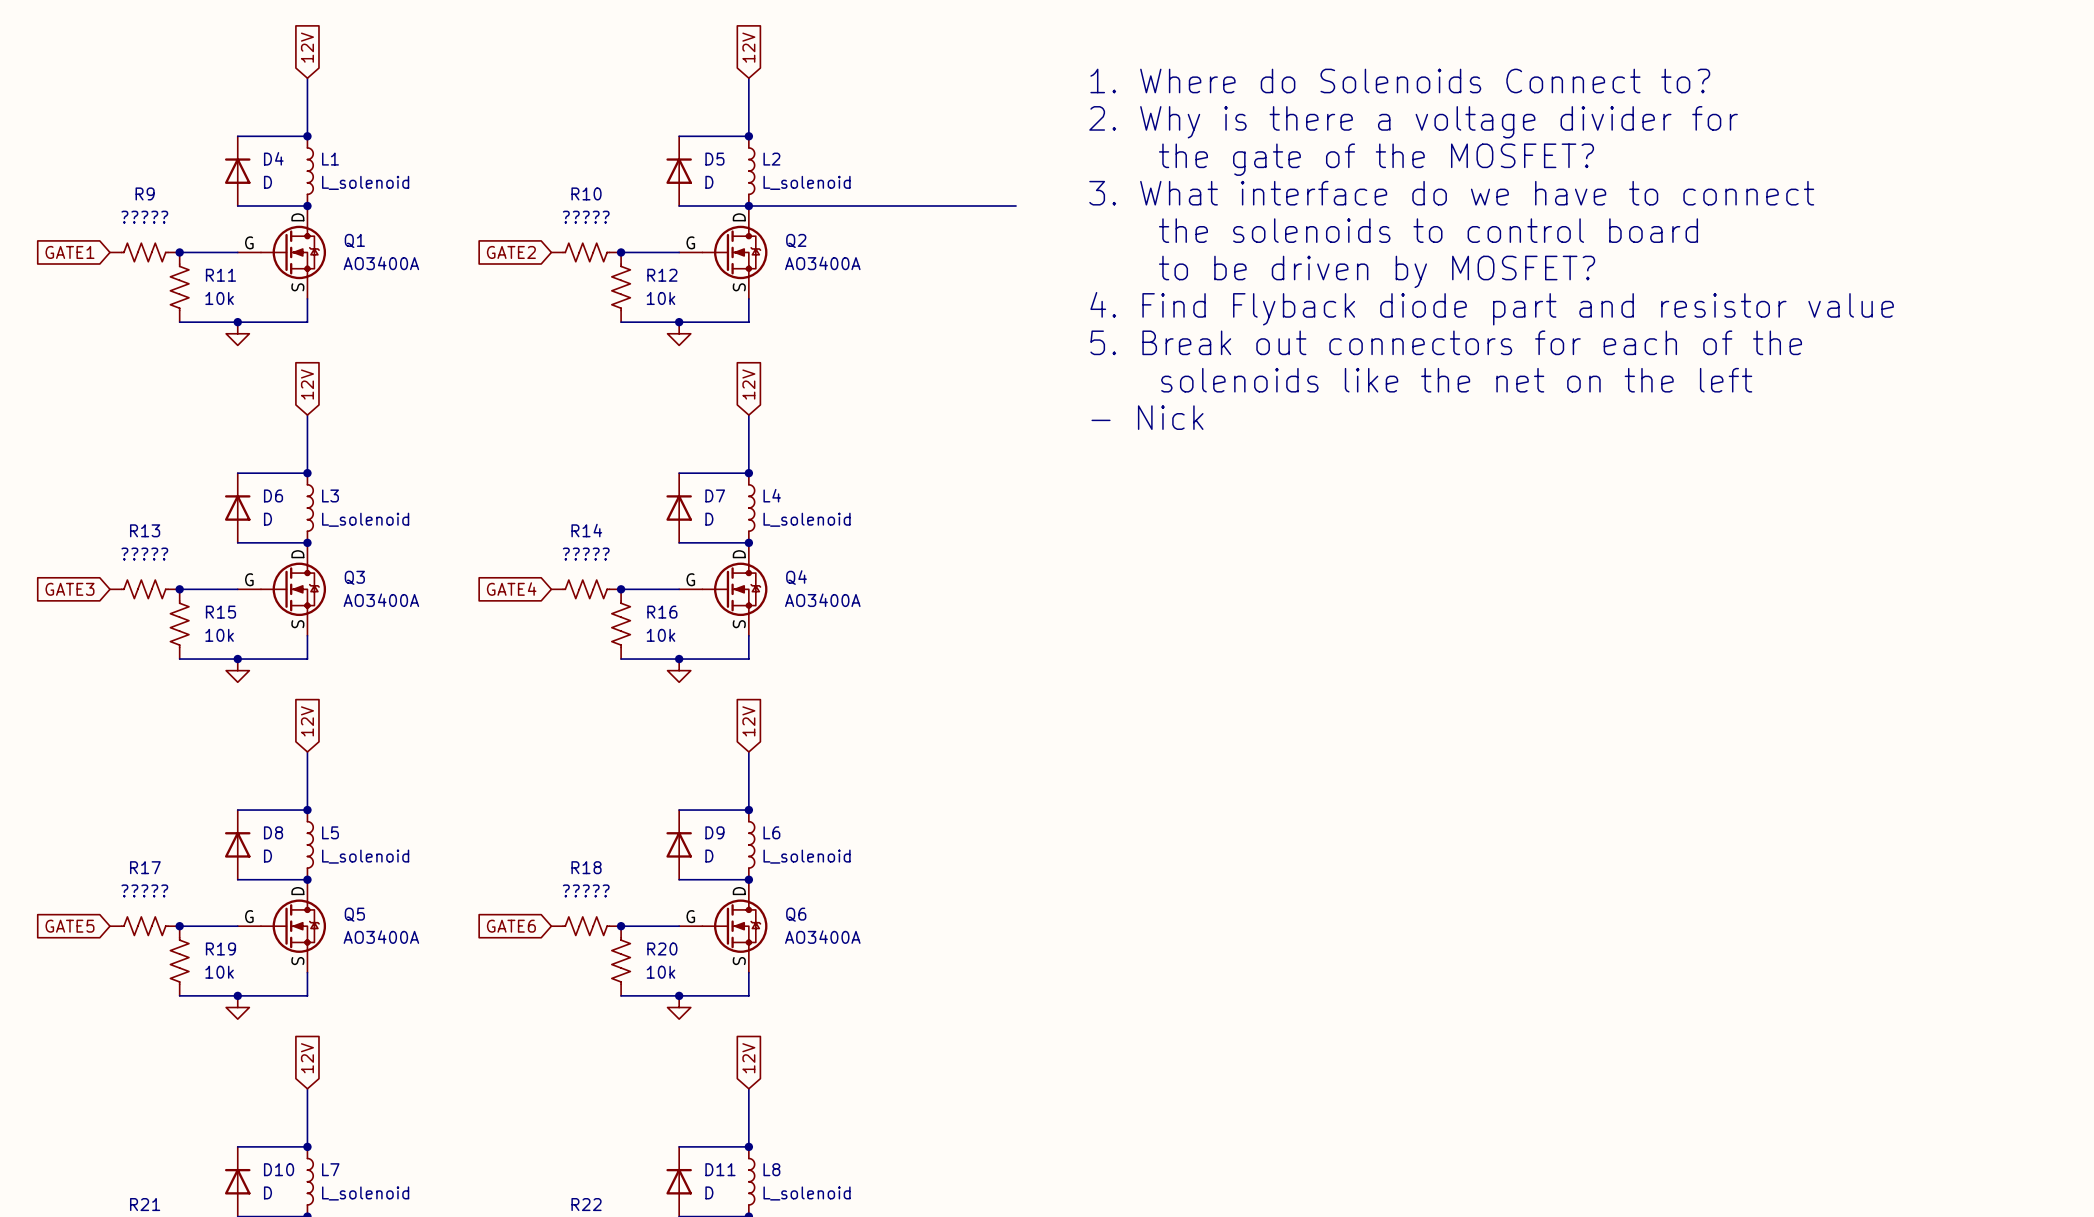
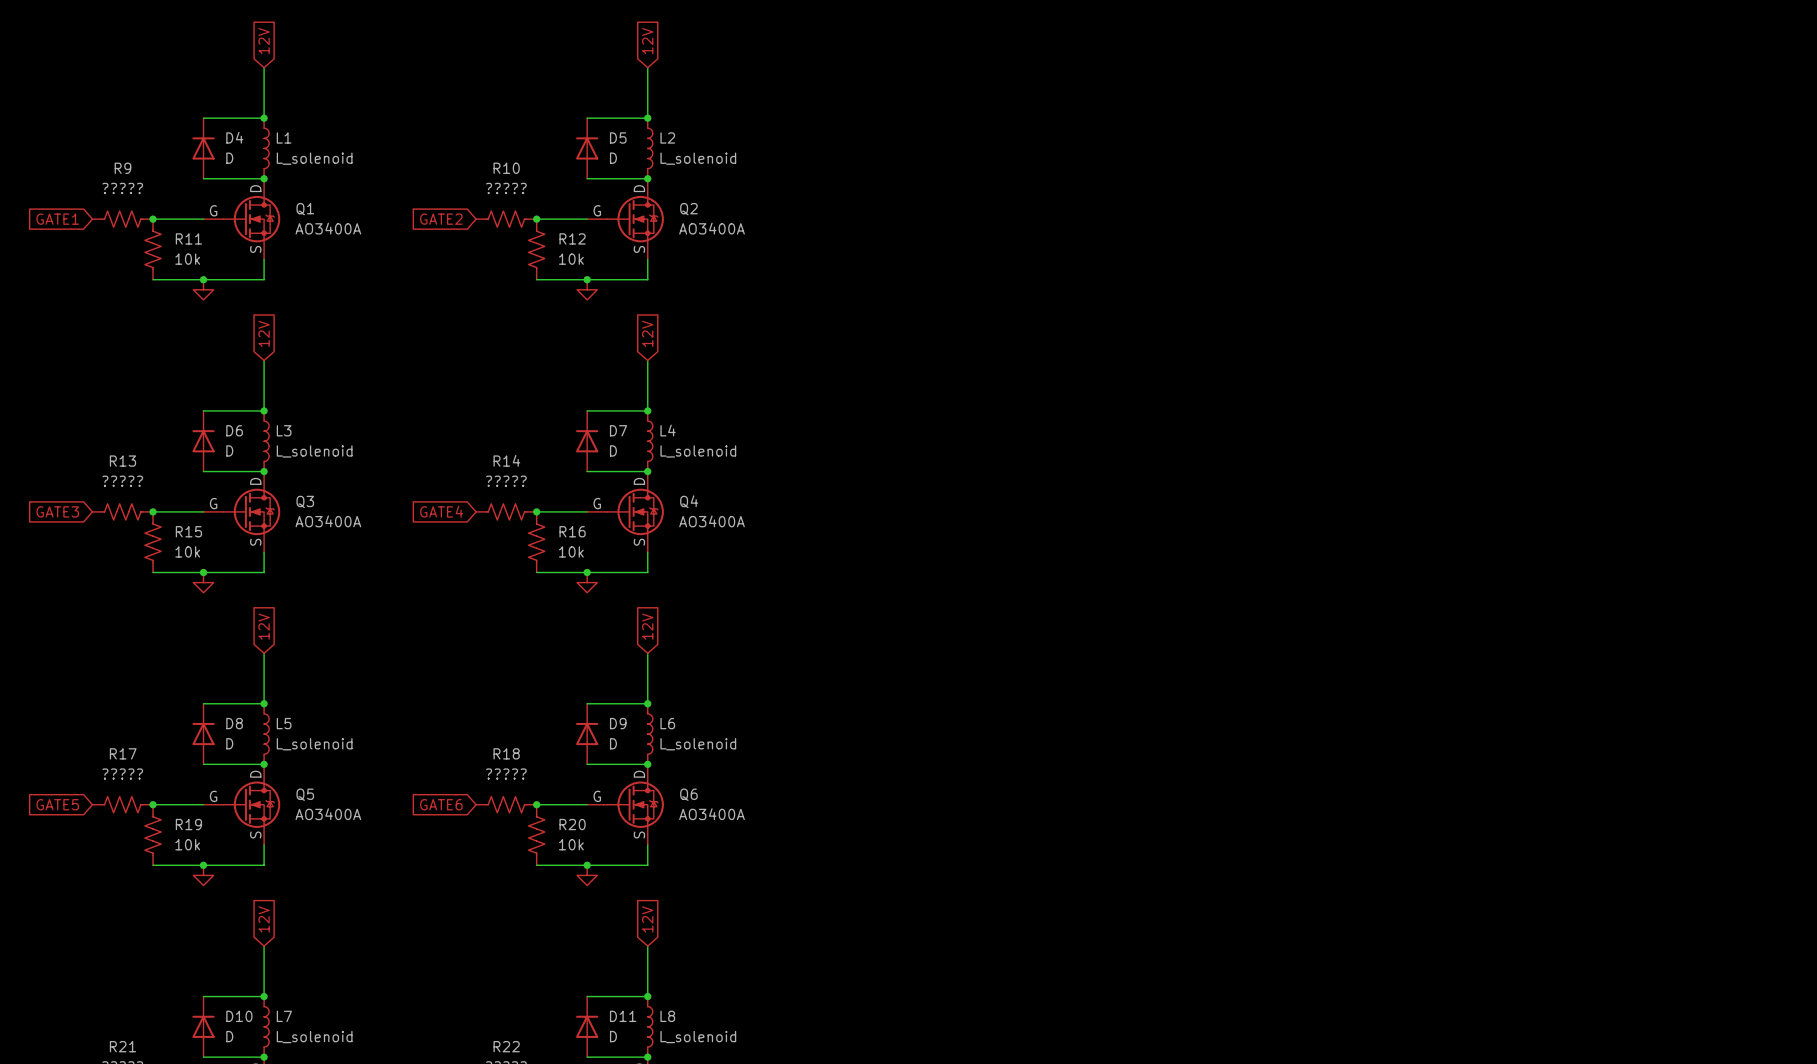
text: 1. Where do Solenoids Connect to? (1400, 80) -> none
text: 2. Why is there a voltage divider for (1413, 122) -> none
text: the gate of the MOSFET? (1376, 159) -> none
text: 3. What interface do we have to connect (1451, 193) -> none
wire: (748, 206) (1016, 206) -> none
text: the solenoids to control board (1428, 230) -> none
text: to be driven by MOSFET? (1377, 271) -> none
text: 4. Find Flyback diode part and resistor value (1492, 308) -> none
text: 5. Break out connectors for each of the (1446, 342) -> none
text: solenoids like the net on the left (1456, 380) -> none
text: - Nick (1147, 417) -> none

